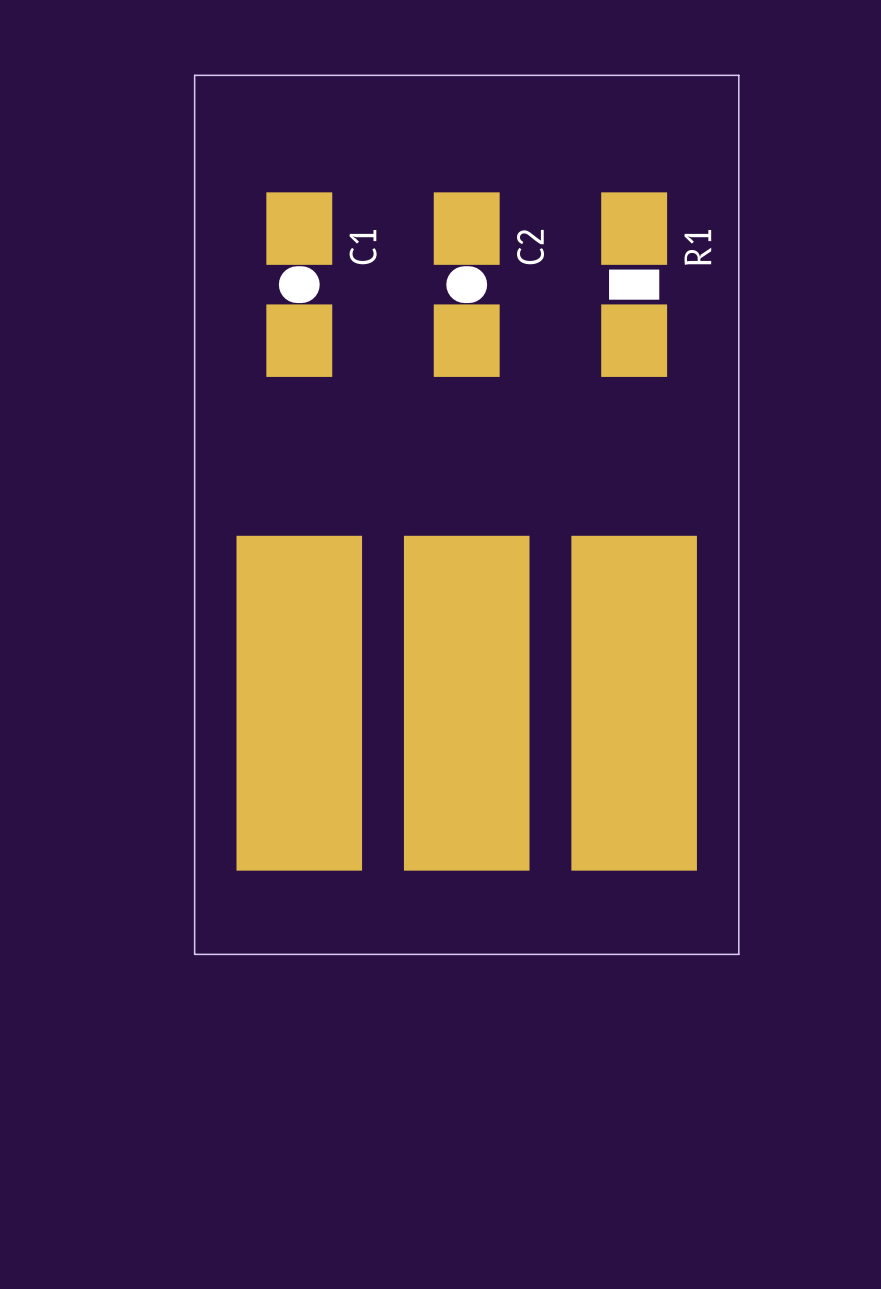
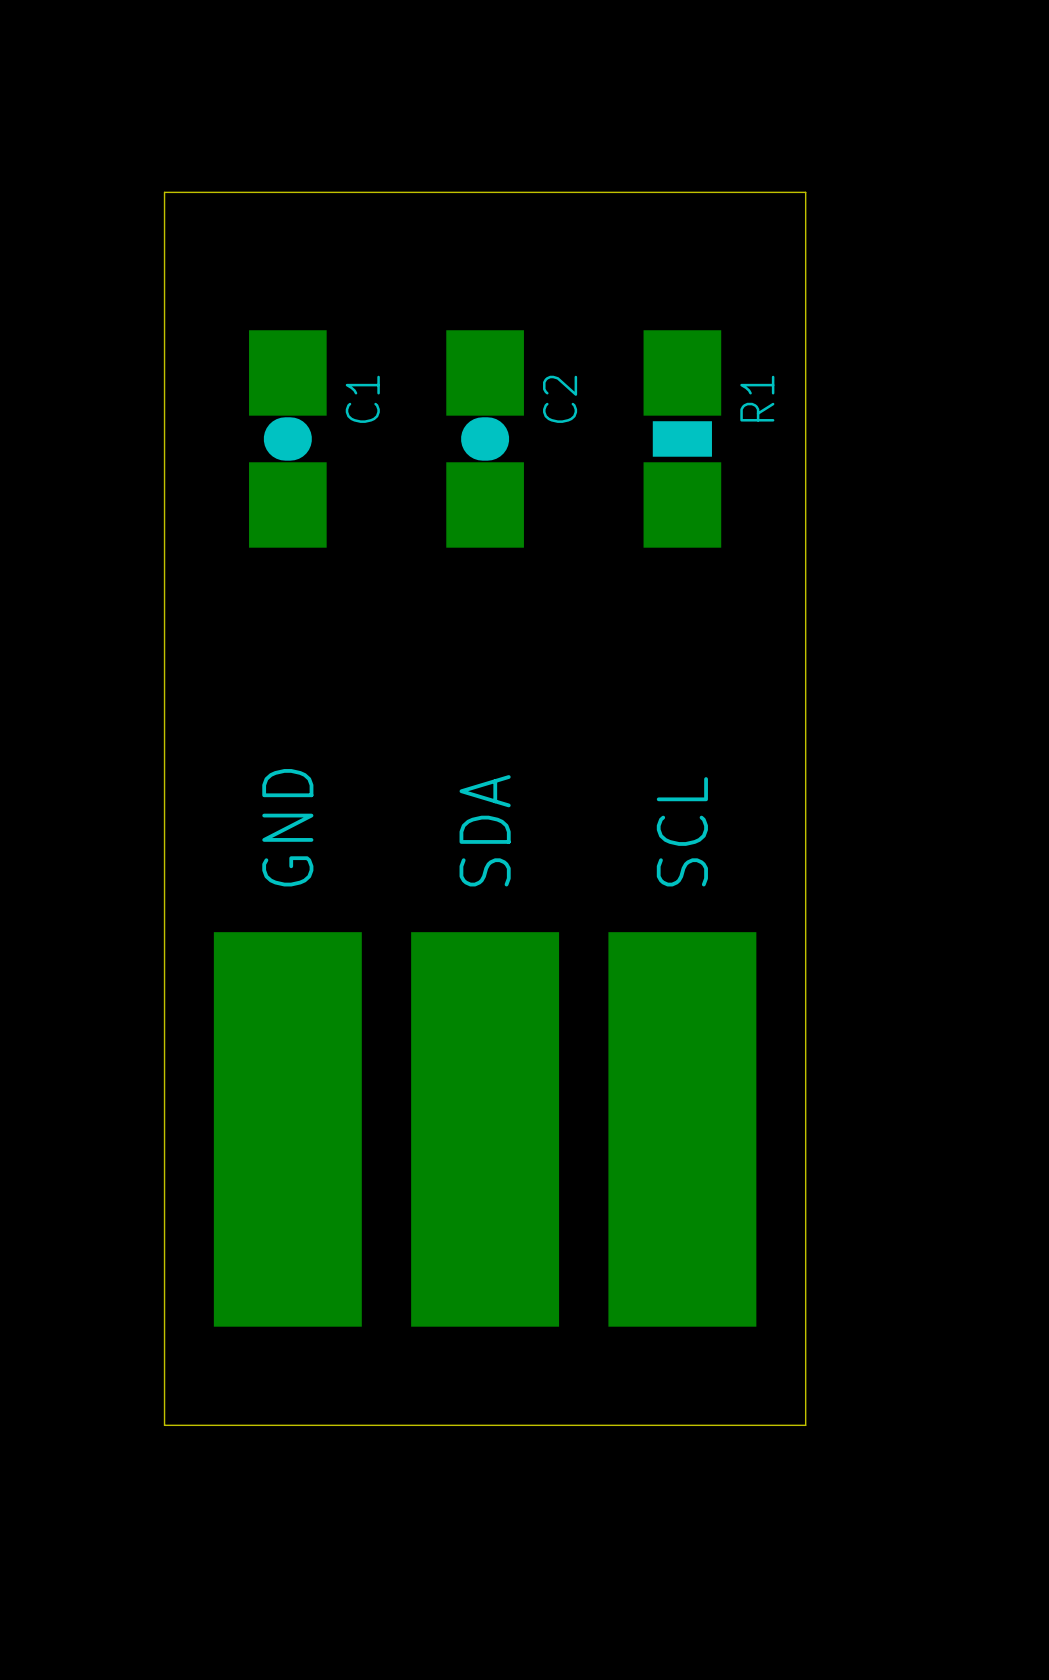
text: none -> GND (287, 827)
text: none -> SDA (485, 830)
text: none -> SCL (682, 831)
part position: (466, 703) -> (485, 1129)
board edge: (738, 954) (194, 954) -> (805, 1228) (805, 1425) (164, 1425) (164, 1228)

